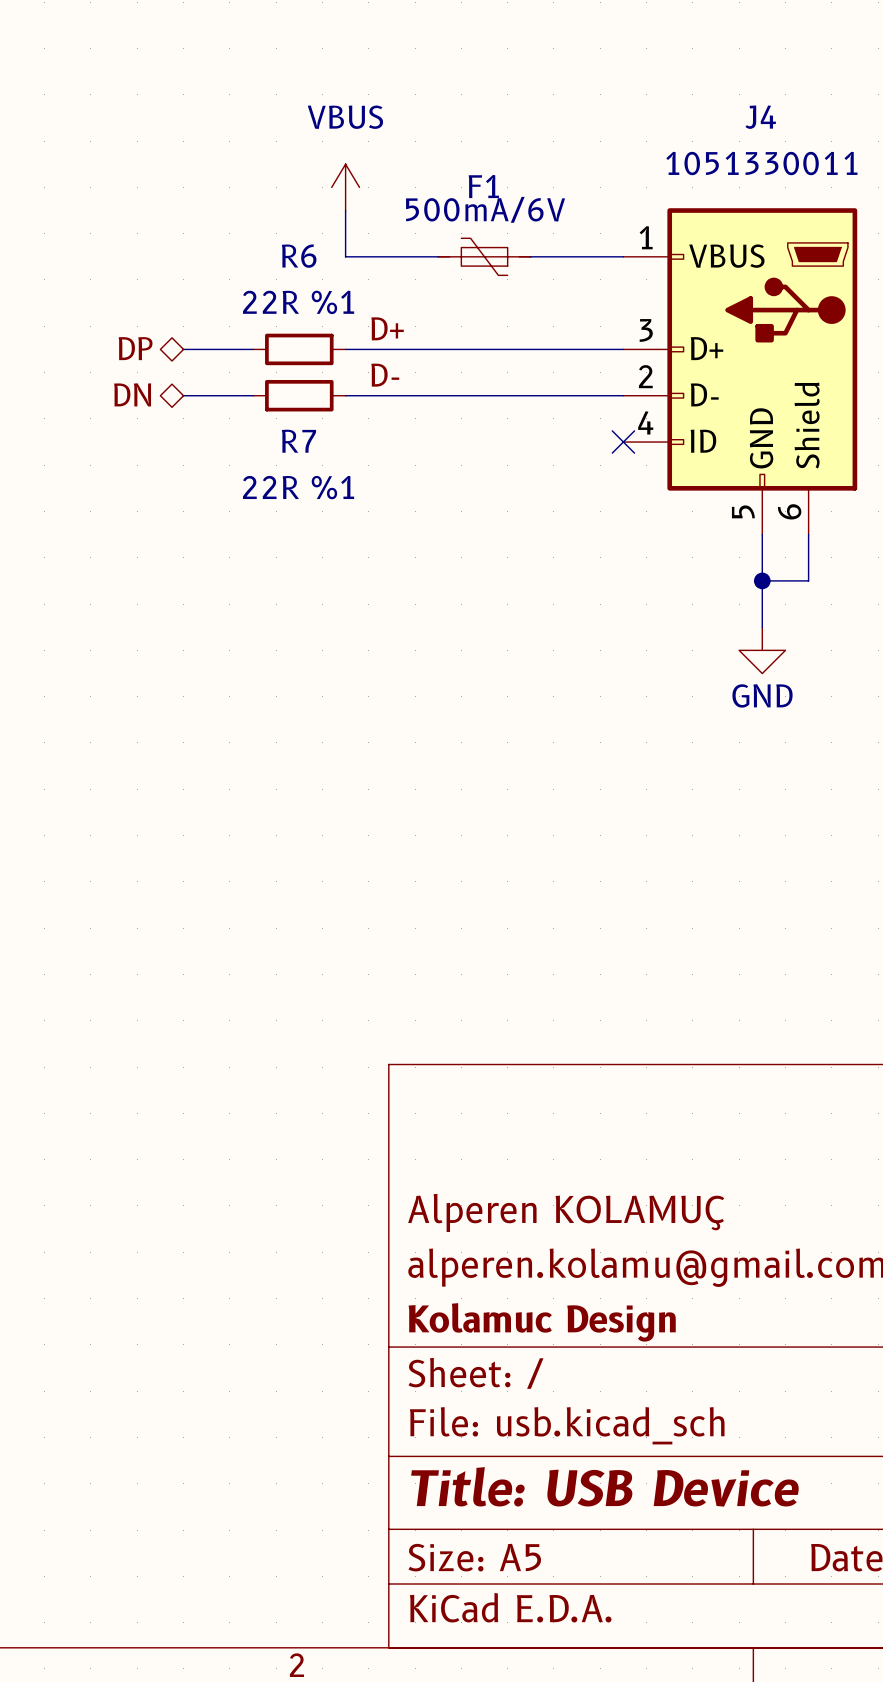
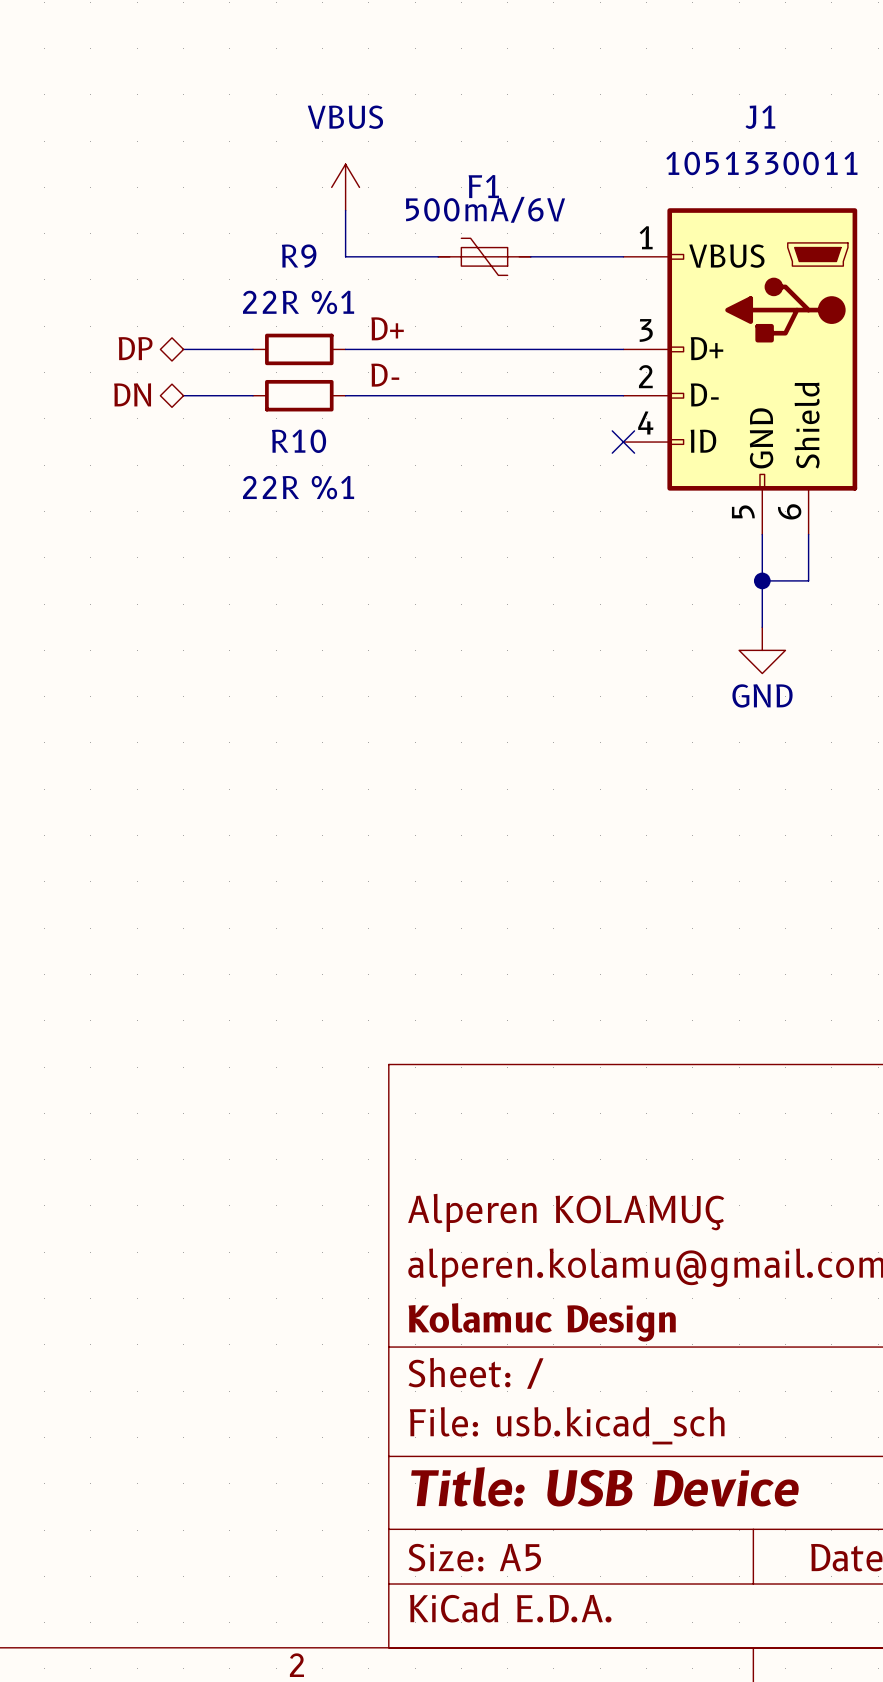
J4 name: J4 (760, 117) -> J1 (760, 117)
R6 name: R6 (299, 256) -> R9 (299, 256)
R7 name: R7 (298, 441) -> R10 (299, 441)

